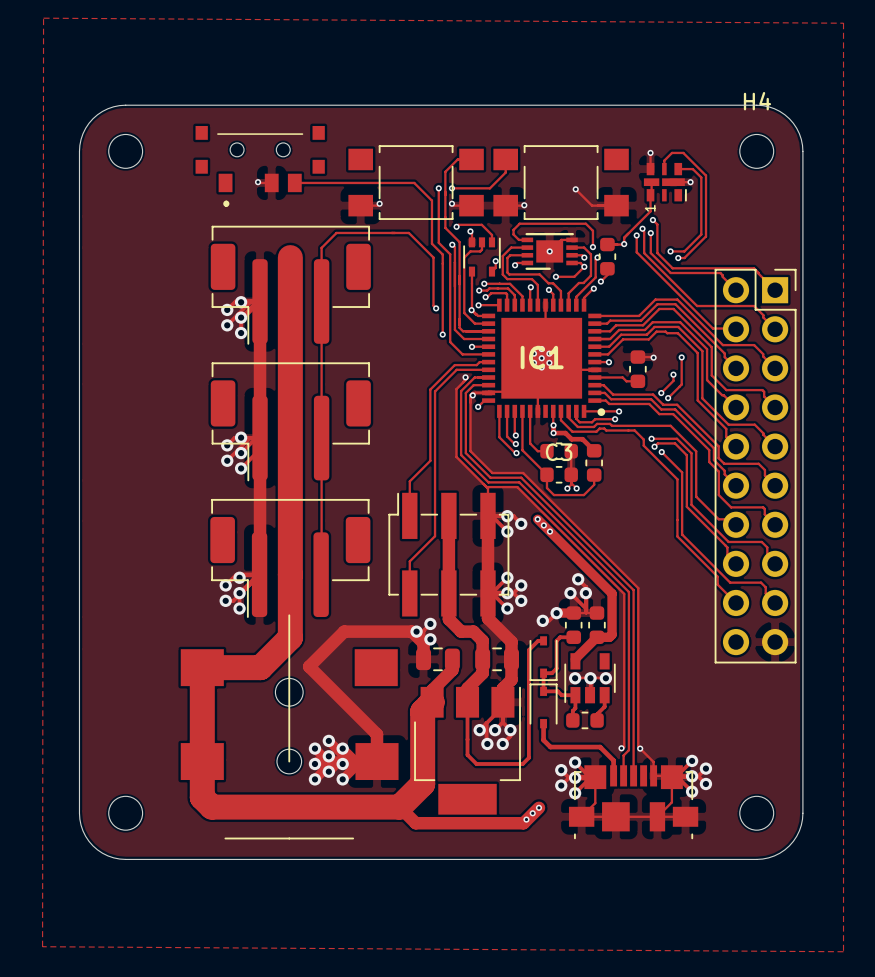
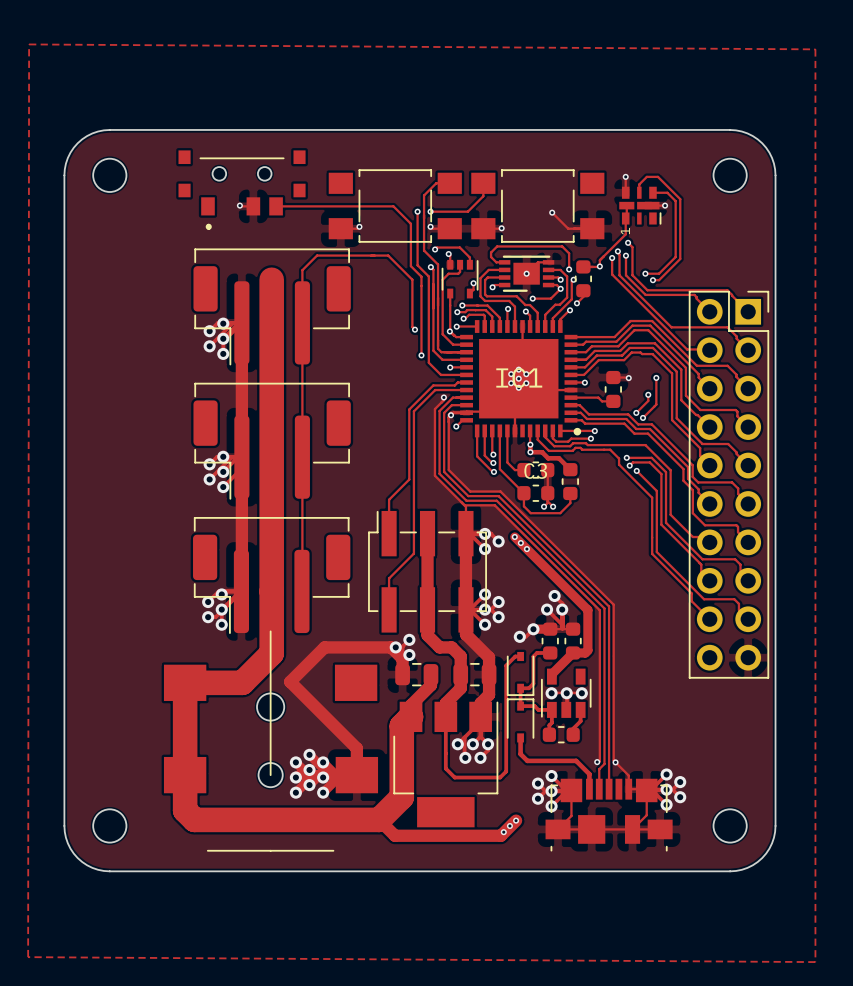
H4 name: H4 (757, 101) -> none

